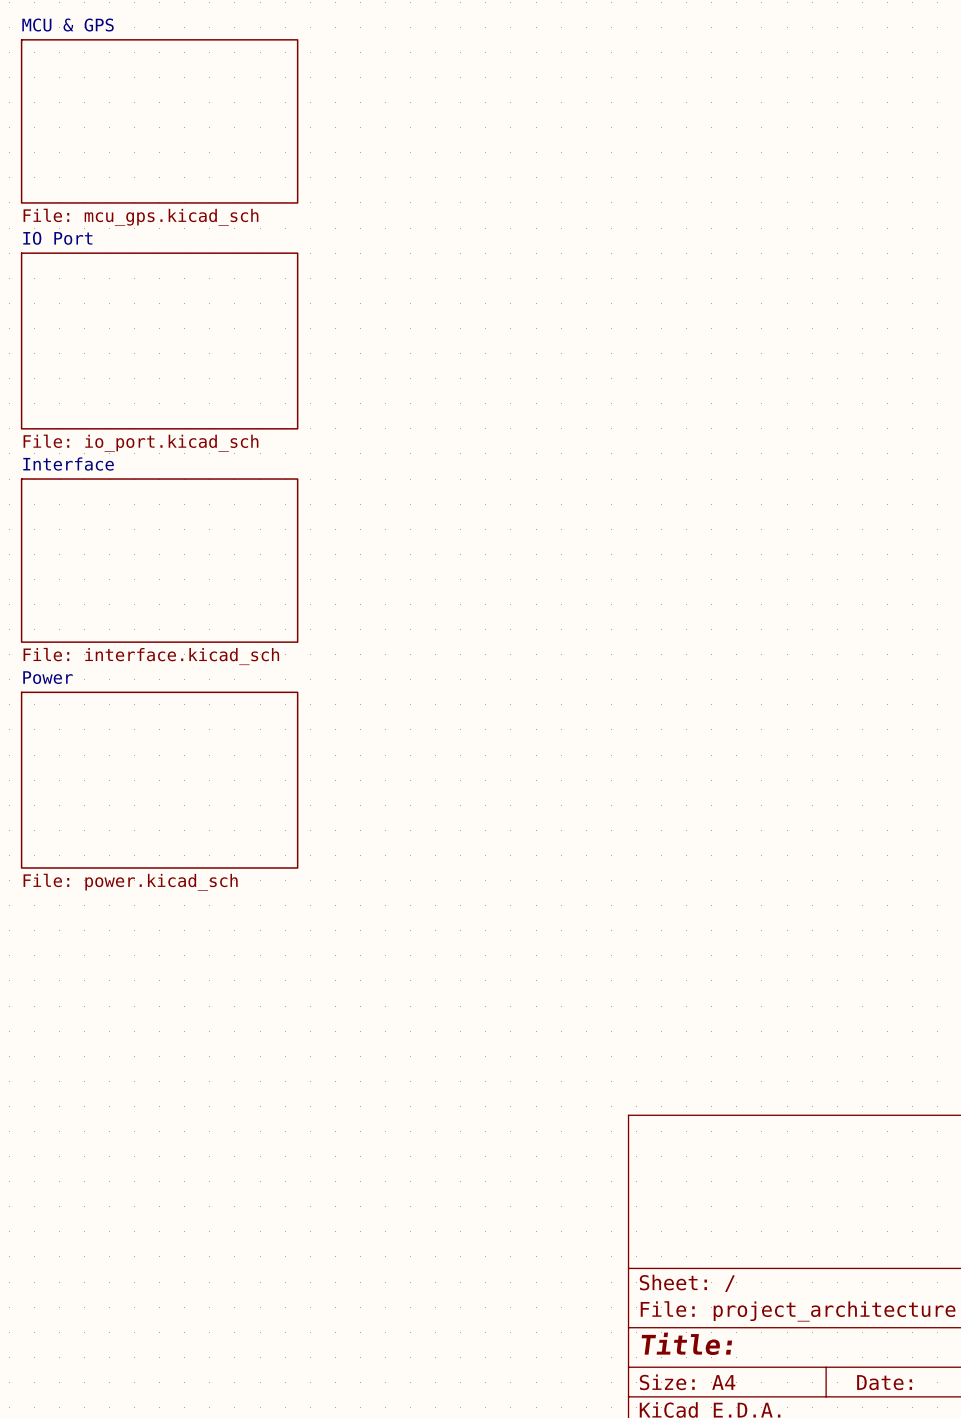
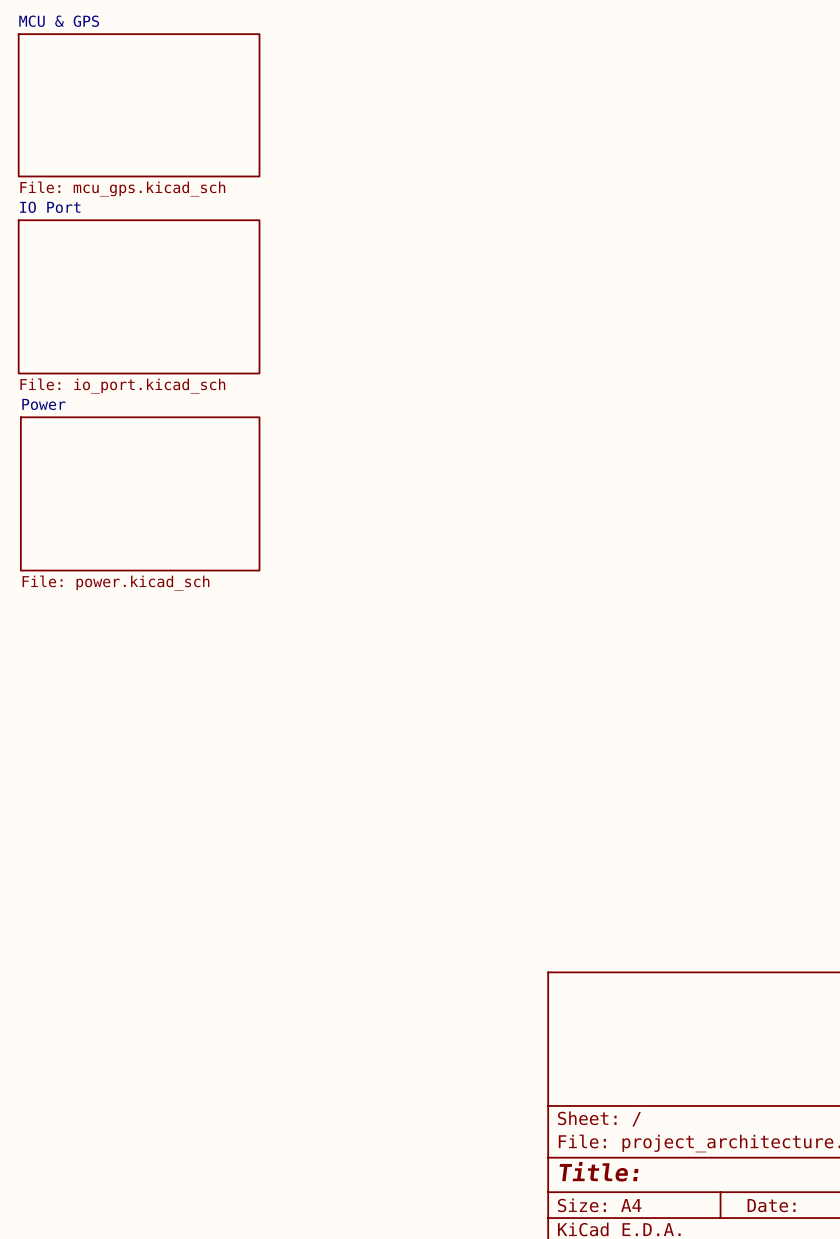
sheet Interface: File: interface.kicad_sch (159, 560) -> none
sheet Power: none -> File: power.kicad_sch (140, 493)
sheet Power: File: power.kicad_sch (159, 780) -> none

